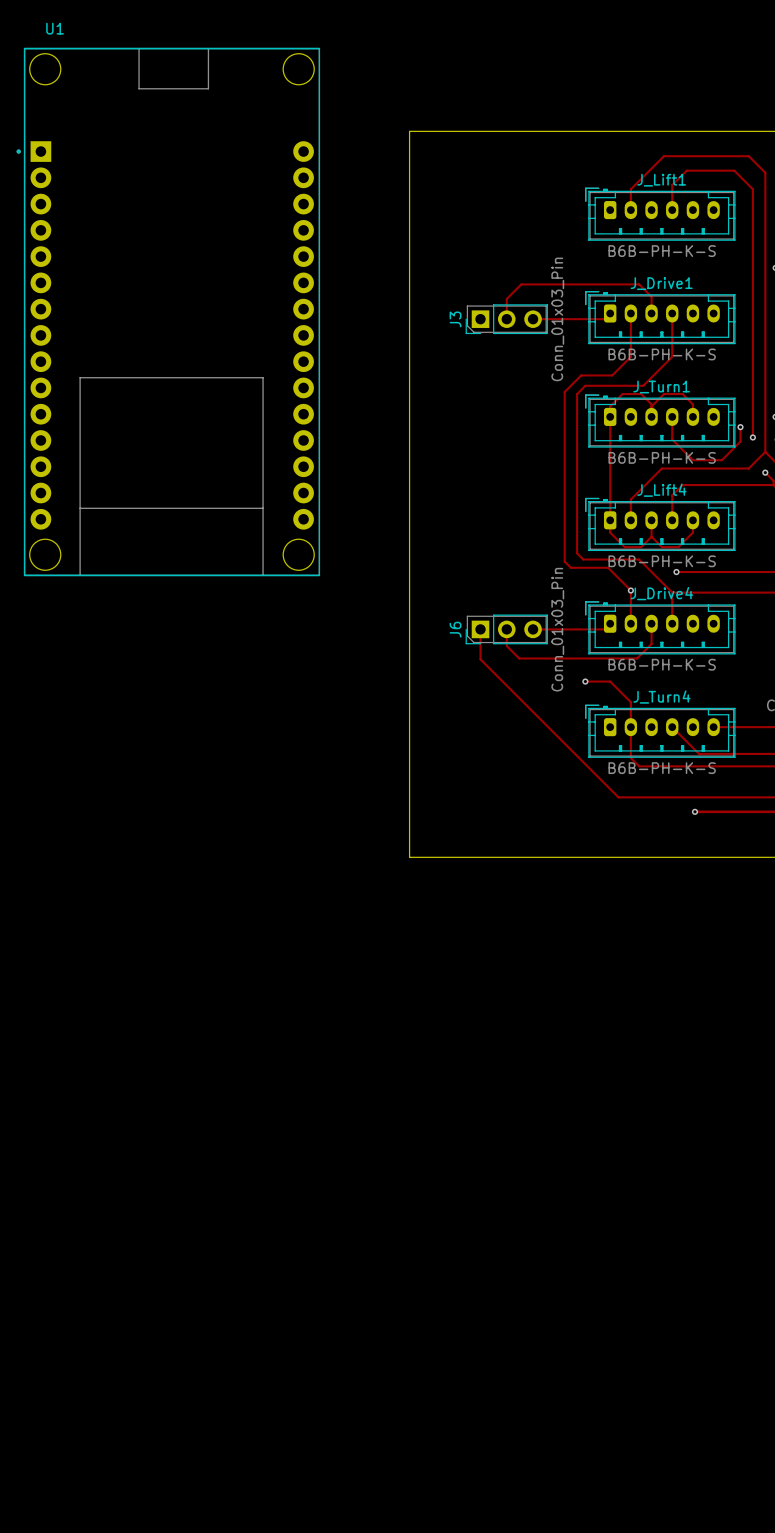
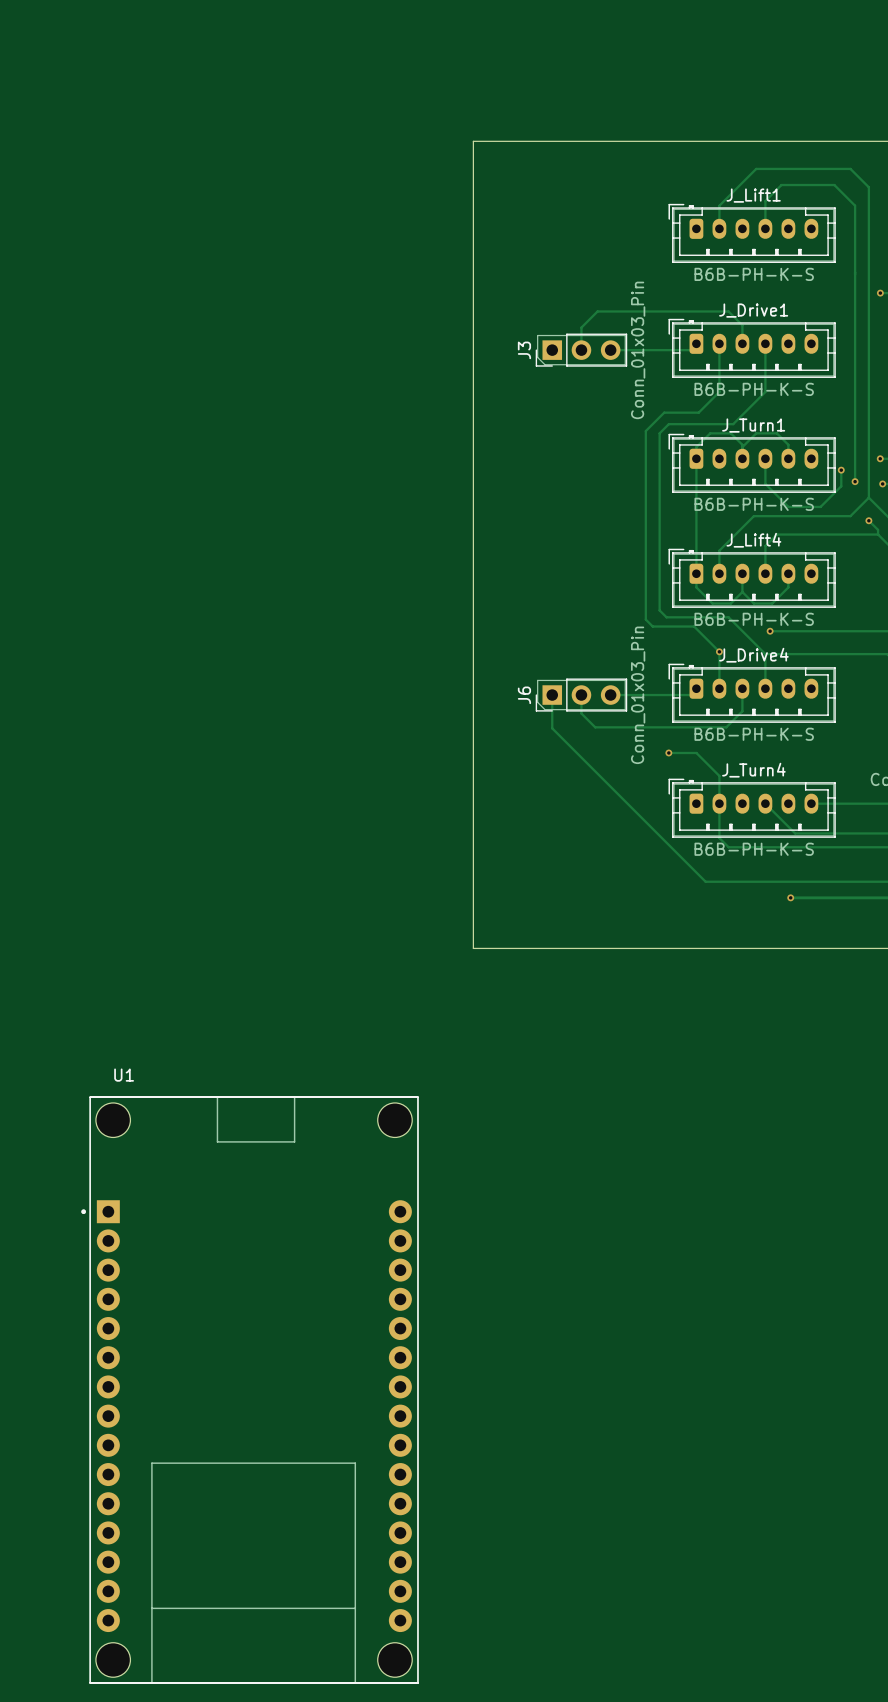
U1 position: (168, 311) -> (250, 1390)

